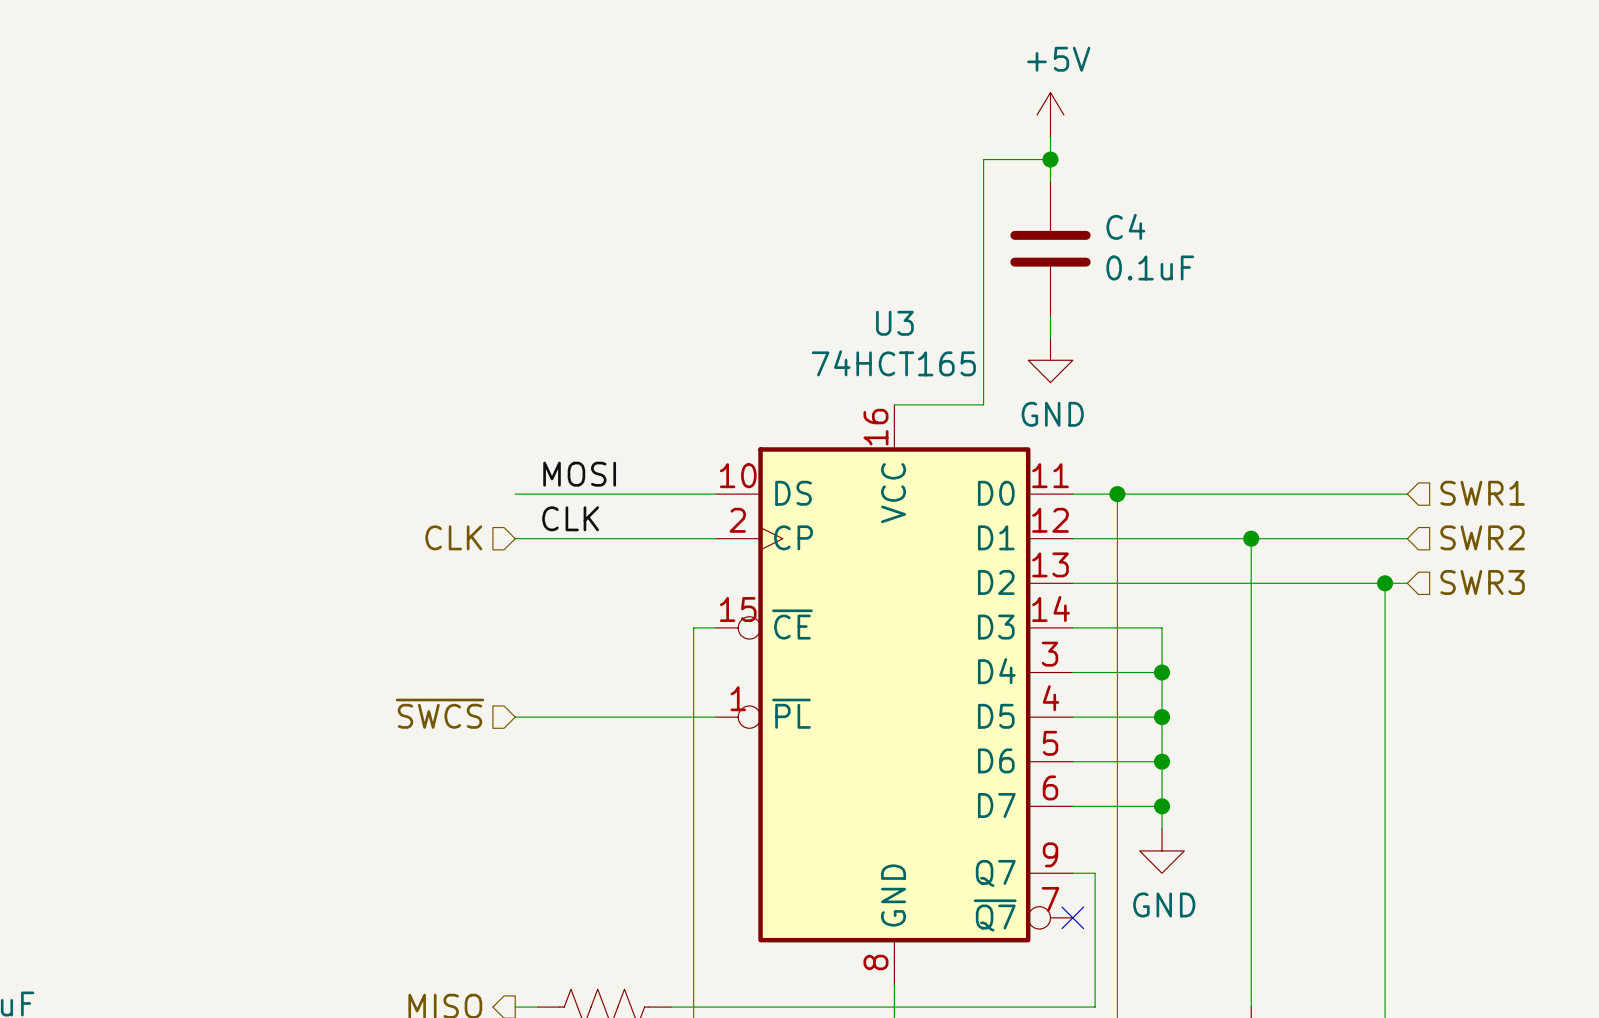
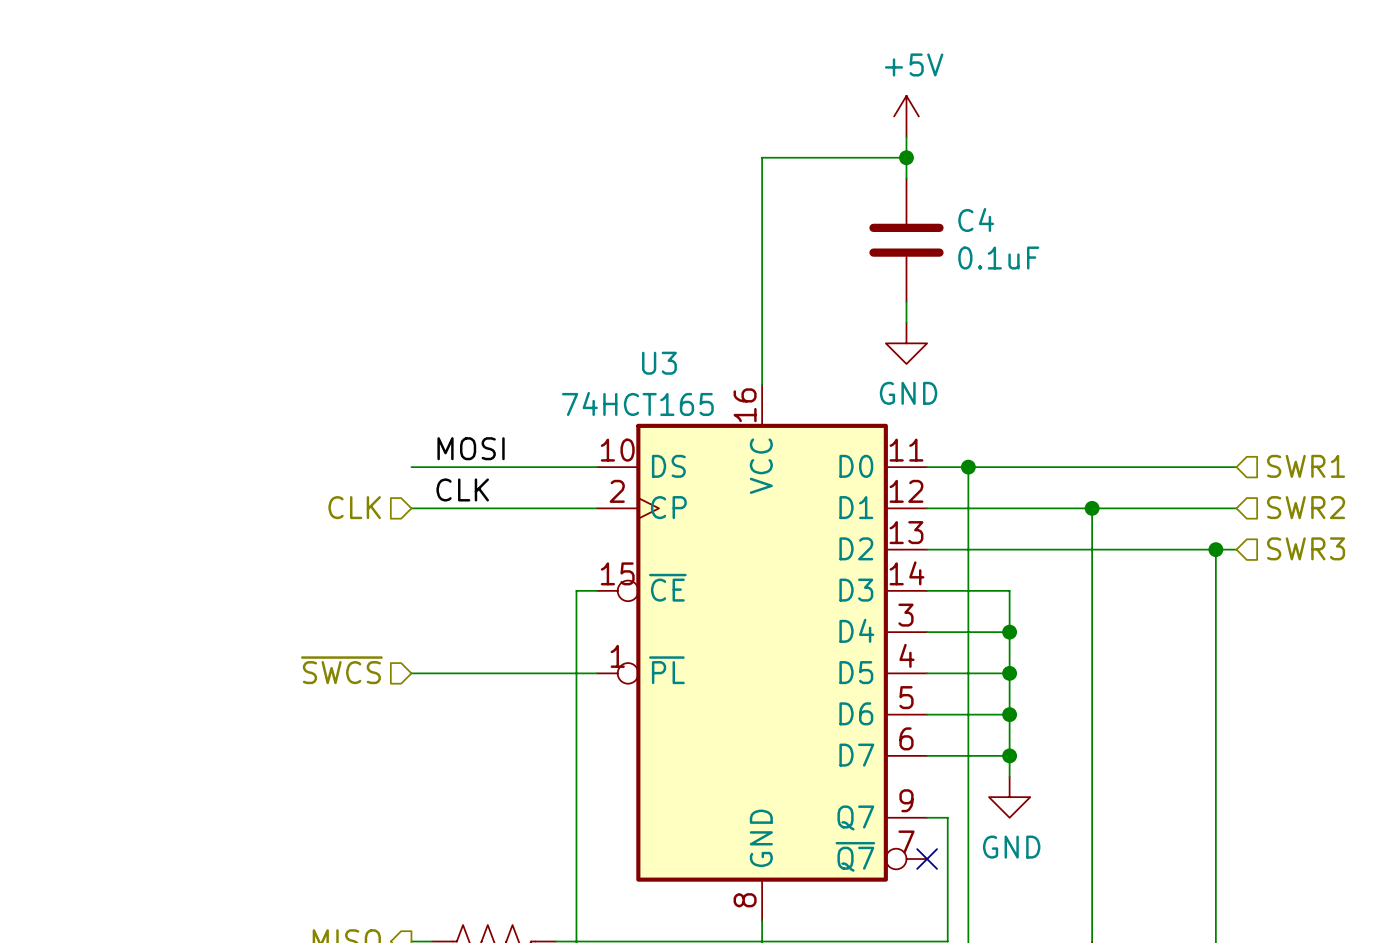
wire: (983, 159) (983, 404) (894, 404) -> (844, 157) (762, 157) (762, 384)
U3 name position: U3 (894, 323) -> U3 (659, 363)
U3 value position: 74HCT165 (893, 363) -> 74HCT165 (637, 403)

